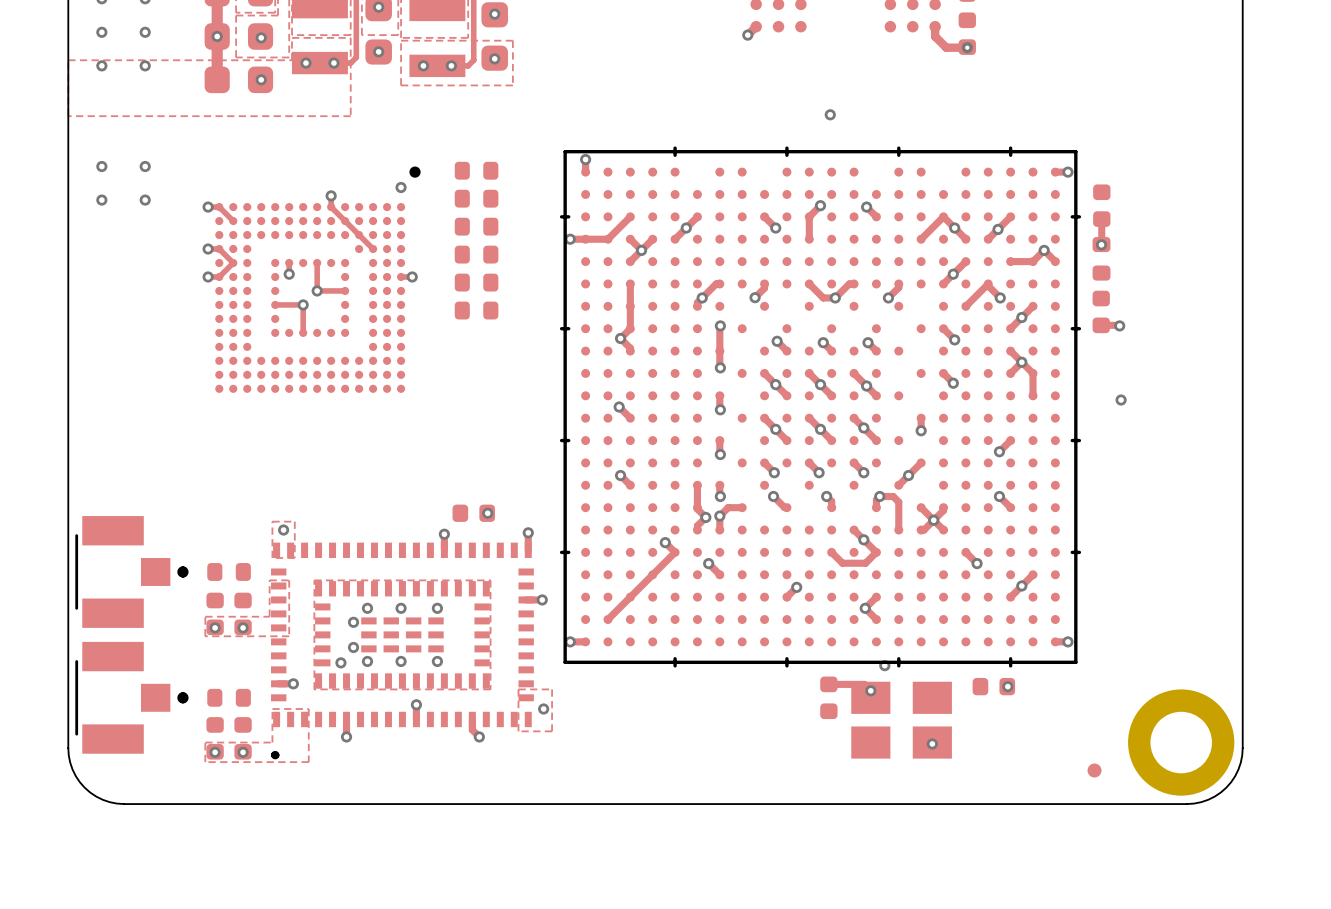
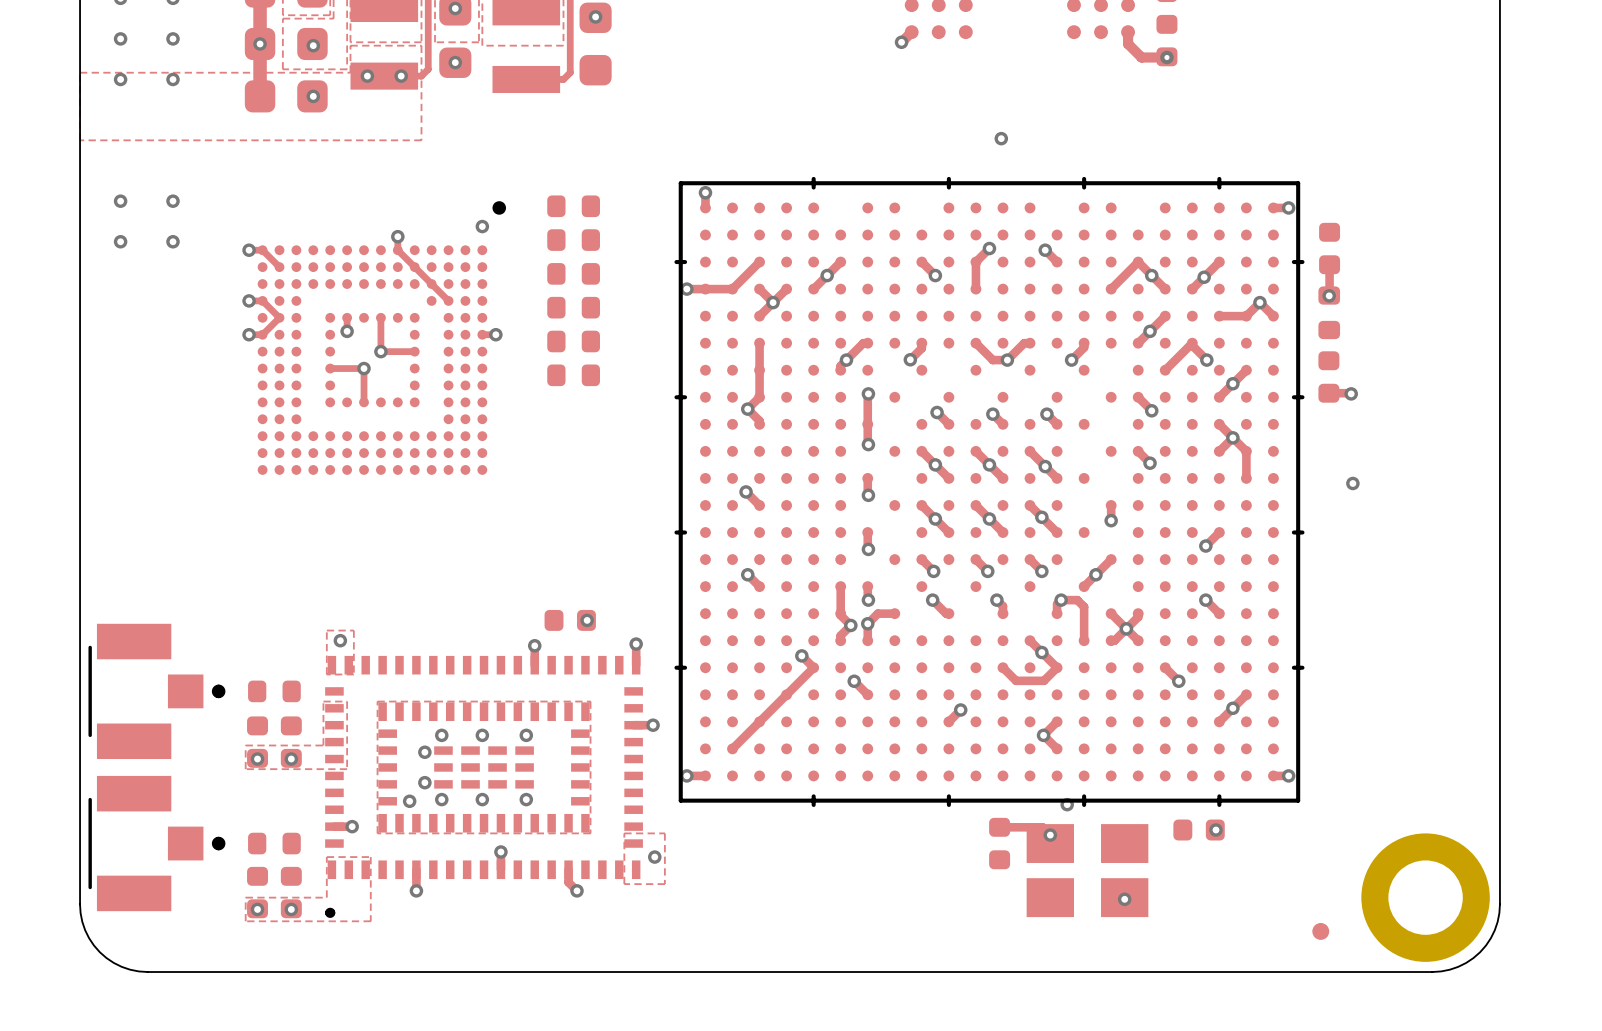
zone outline: (401, 40) (401, 85) (512, 85) (512, 40) (401, 40) -> none
via: (494, 58) -> none
via: (423, 65) -> none
via: (451, 65) -> none

